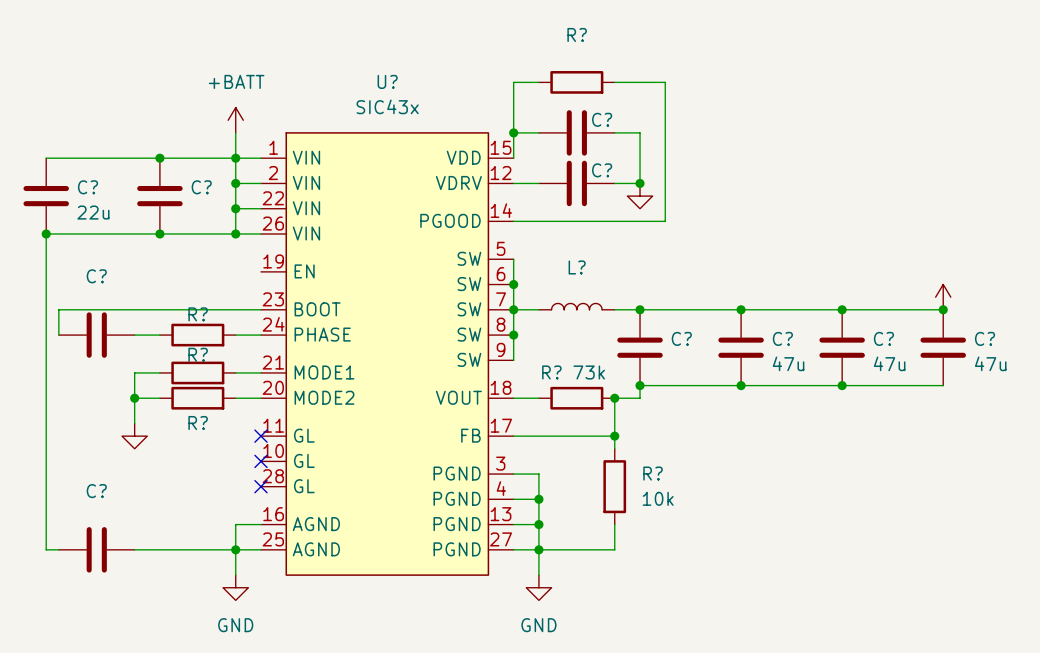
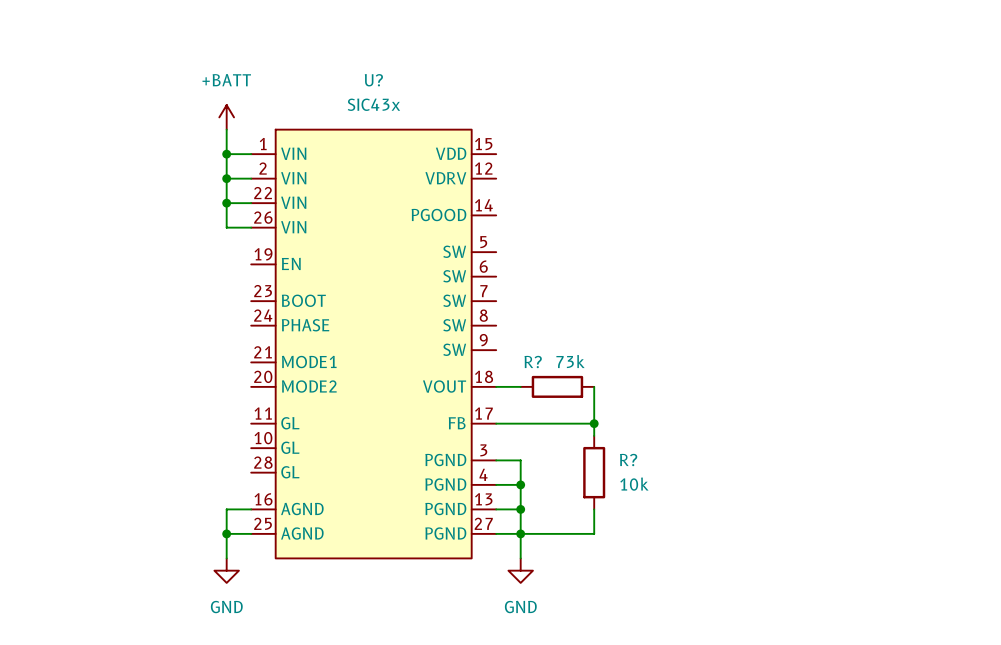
wire: (538, 82) (513, 82) (513, 158) -> none
R?: (576, 82) -> none
wire: (614, 82) (665, 82) (665, 221) (513, 221) -> none
wire: (513, 132) (538, 132) -> none
junction: (513, 132) -> none
C?: (576, 132) -> none
wire: (614, 132) (640, 132) (640, 183) (614, 183) -> none
wire: (46, 158) (235, 158) -> none
junction: (159, 158) -> none
wire: (513, 183) (538, 183) -> none
C?: (576, 183) -> none
junction: (640, 183) -> none
C?: 22u (46, 196) -> none
C?: (159, 196) -> none
power symbol: (640, 196) -> none
junction: (46, 233) -> none
junction: (159, 233) -> none
wire: (235, 233) (46, 233) (46, 549) (58, 549) -> none
junction: (235, 233) -> none
wire: (513, 259) (513, 360) -> none
junction: (513, 284) -> none
power symbol: (943, 297) -> none
L?: (576, 306) -> none
wire: (260, 309) (58, 309) (58, 335) -> none
wire: (513, 309) (538, 309) -> none
junction: (513, 309) -> none
wire: (614, 309) (943, 309) -> none
junction: (640, 309) -> none
junction: (741, 309) -> none
junction: (842, 309) -> none
junction: (943, 309) -> none
C?: (96, 335) -> none
wire: (134, 335) (159, 335) -> none
R?: (197, 335) -> none
wire: (235, 335) (260, 335) -> none
junction: (513, 335) -> none
C?: (640, 347) -> none
C?: 47u (741, 347) -> none
C?: 47u (842, 347) -> none
C?: 47u (943, 347) -> none
wire: (159, 372) (134, 372) (134, 423) -> none
R?: (197, 372) -> none
wire: (235, 372) (260, 372) -> none
junction: (640, 385) -> none
junction: (741, 385) -> none
junction: (842, 385) -> none
wire: (943, 385) (640, 385) (640, 398) (614, 398) -> none
wire: (134, 398) (159, 398) -> none
junction: (134, 398) -> none
R?: (197, 398) -> none
wire: (235, 398) (260, 398) -> none
junction: (614, 398) -> none
power symbol: (134, 436) -> none
no-connect mark: (260, 436) -> none
no-connect mark: (260, 461) -> none
no-connect mark: (260, 486) -> none
C?: (96, 549) -> none
wire: (134, 549) (235, 549) -> none

